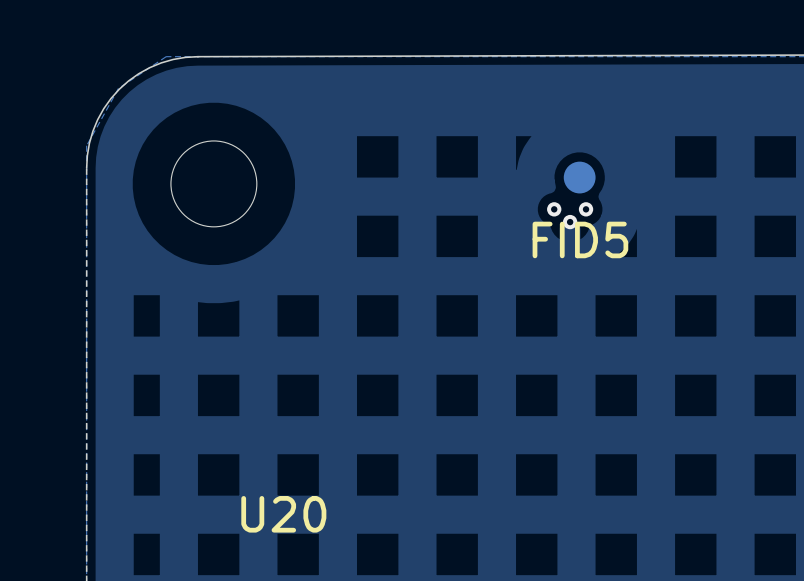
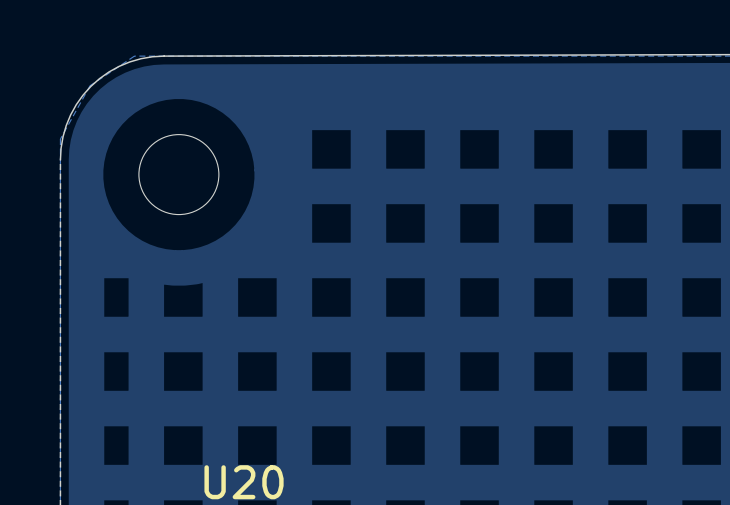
FID5: (579, 177) -> none
via: (554, 209) -> none
via: (586, 209) -> none
via: (570, 222) -> none

